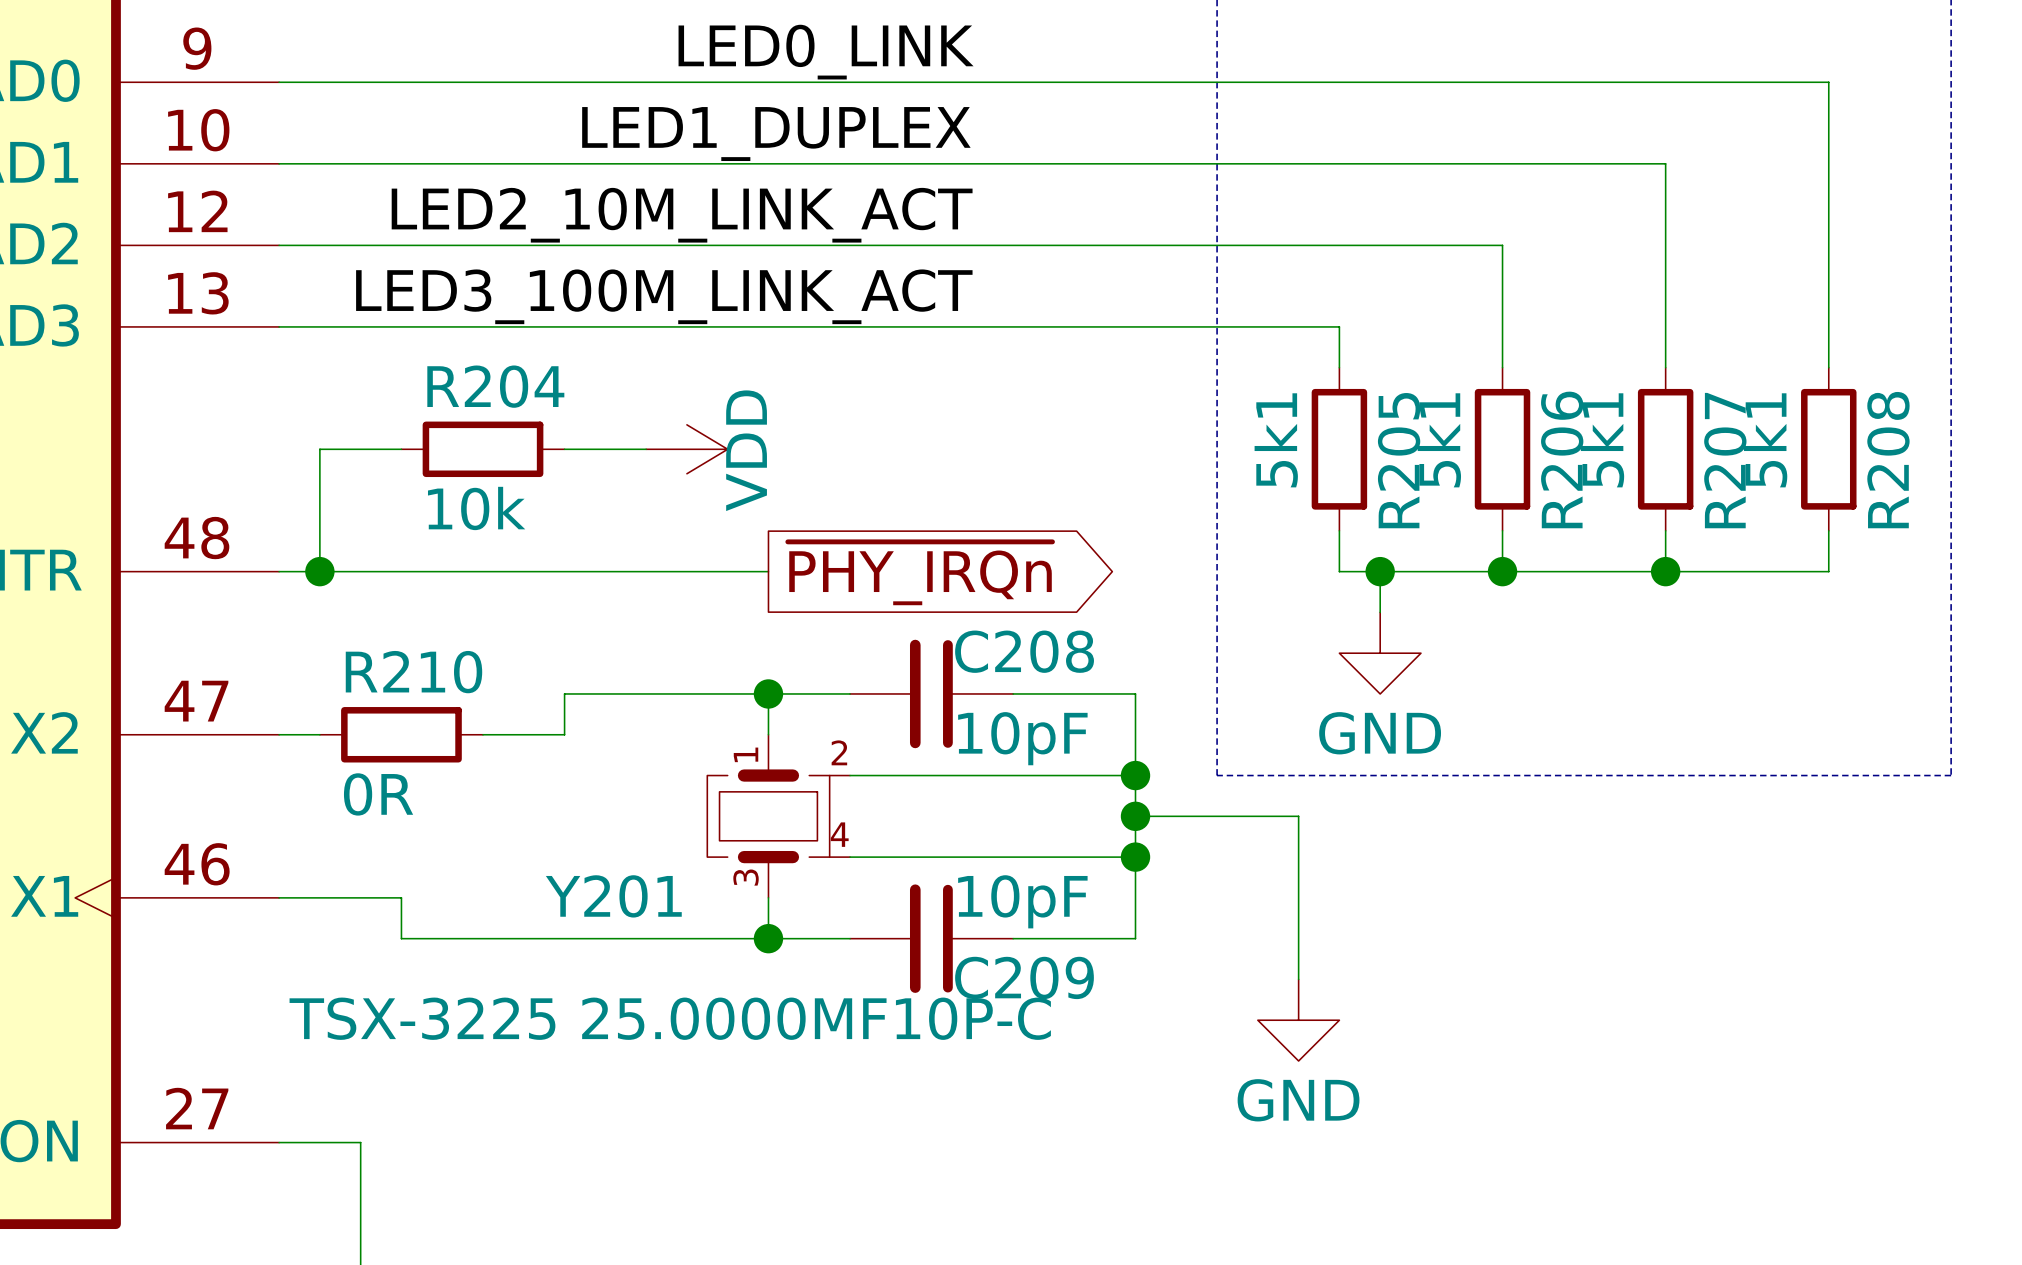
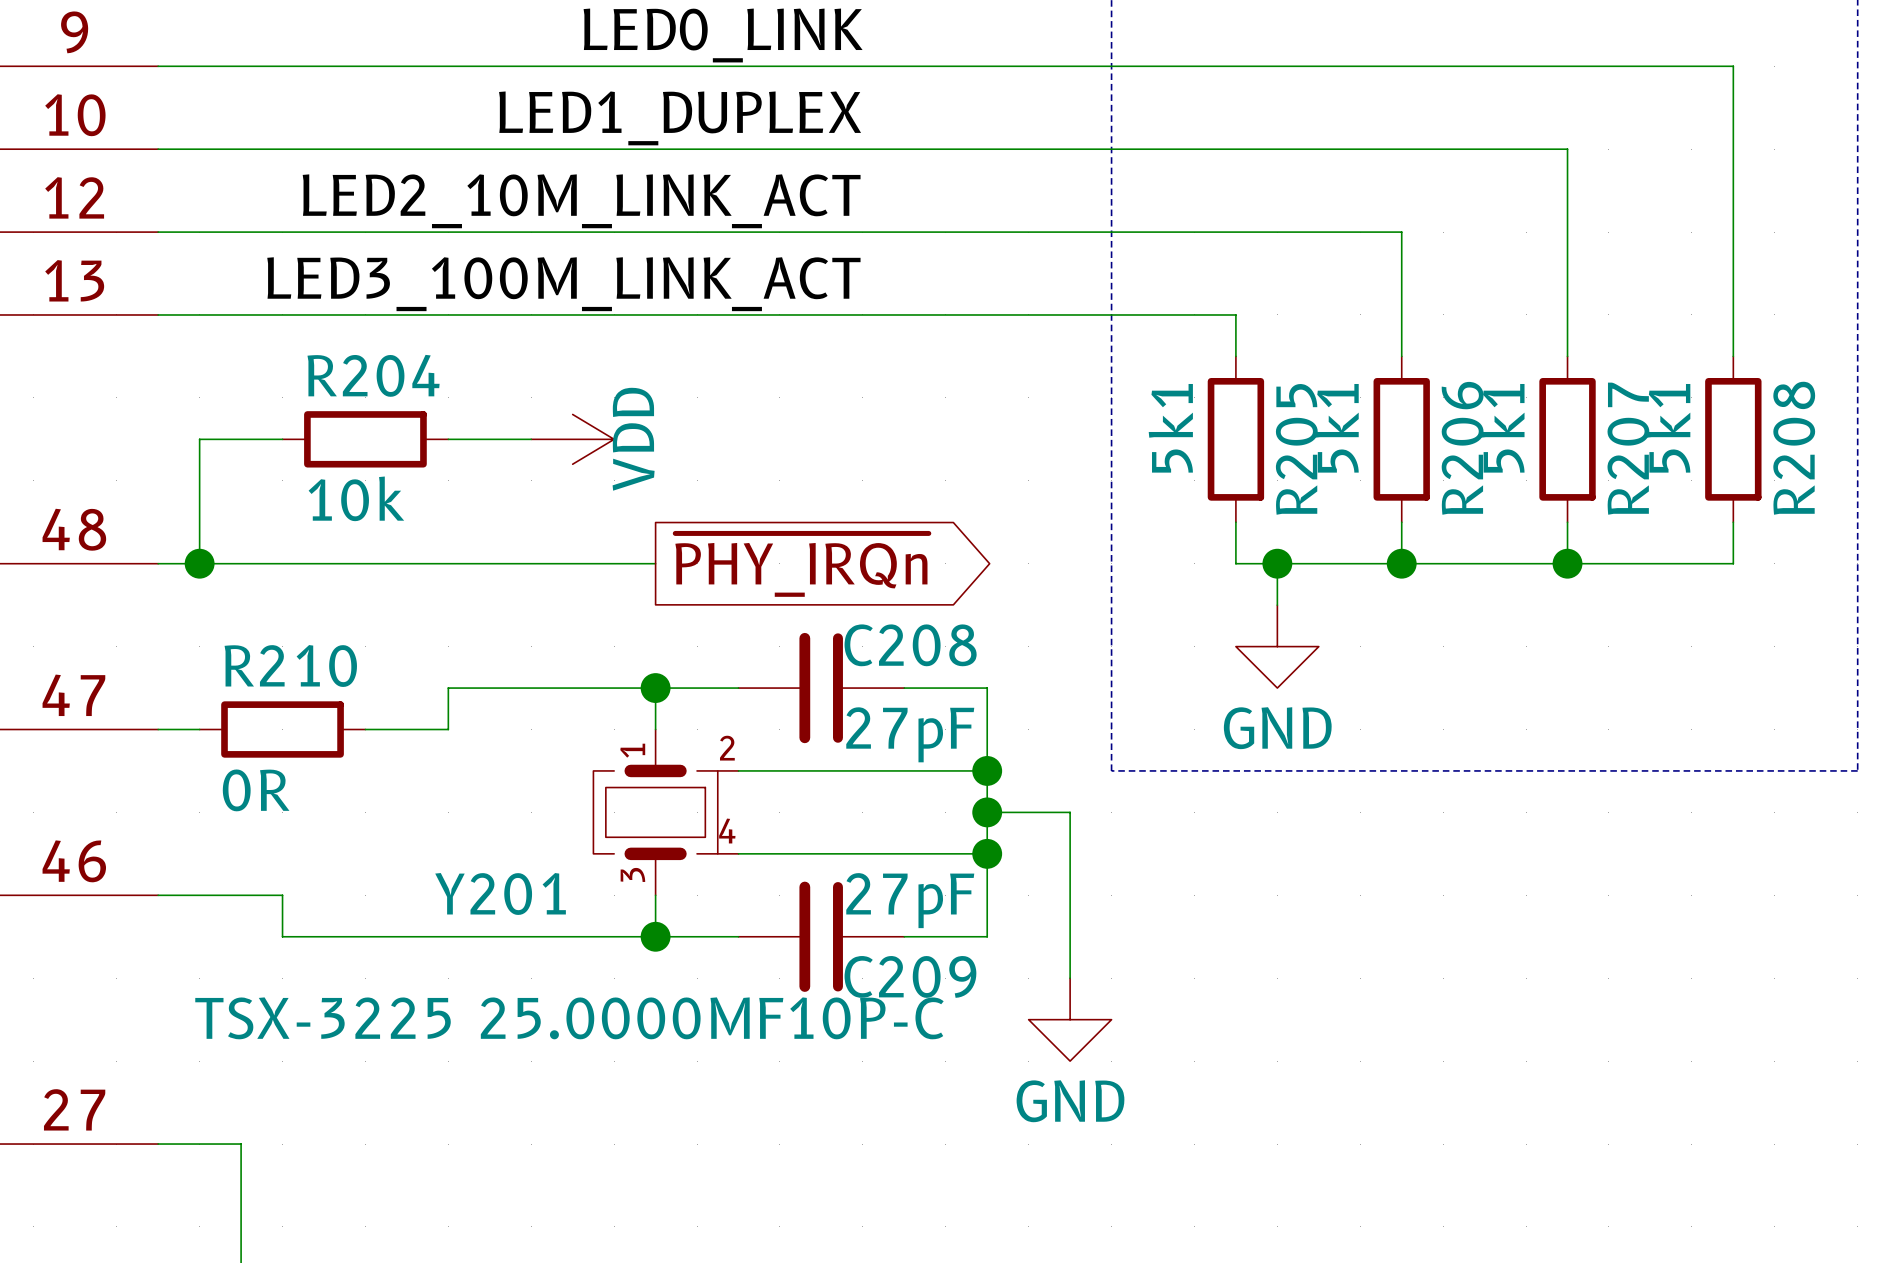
wire: (1094, 693) (1135, 693) (1135, 938) (1094, 938) -> (987, 688) (987, 936)
C208 value: 10pF (1022, 738) -> 27pF (910, 734)
wire: (1094, 775) (1135, 775) -> (987, 812) (1028, 812)
junction: none -> (987, 770)
junction: (1135, 775) -> none
junction: none -> (987, 812)
junction: (1135, 816) -> none
wire: (1176, 816) (1298, 816) (1298, 979) -> (1070, 812) (1070, 978)
wire: (1094, 857) (1135, 857) -> none
junction: none -> (987, 853)
junction: (1135, 857) -> none
C209 value: 10pF (1022, 901) -> 27pF (910, 900)
power symbol position: GND (1298, 1020) -> GND (1070, 1019)

